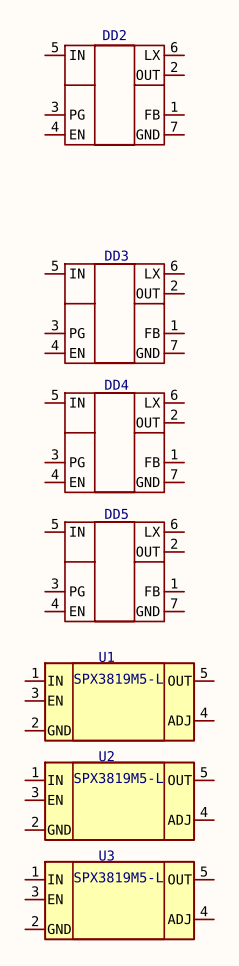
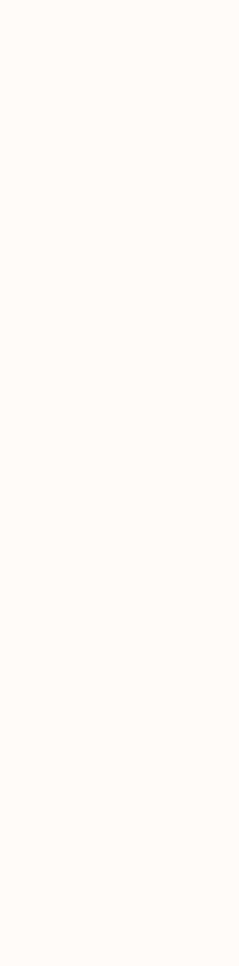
DD2: (114, 95) -> none
DD3: (114, 313) -> none
DD4: (114, 442) -> none
DD5: (114, 571) -> none
U1: SPX3819M5-L (119, 701) -> none
U2: SPX3819M5-L (119, 801) -> none
U3: SPX3819M5-L (119, 900) -> none

